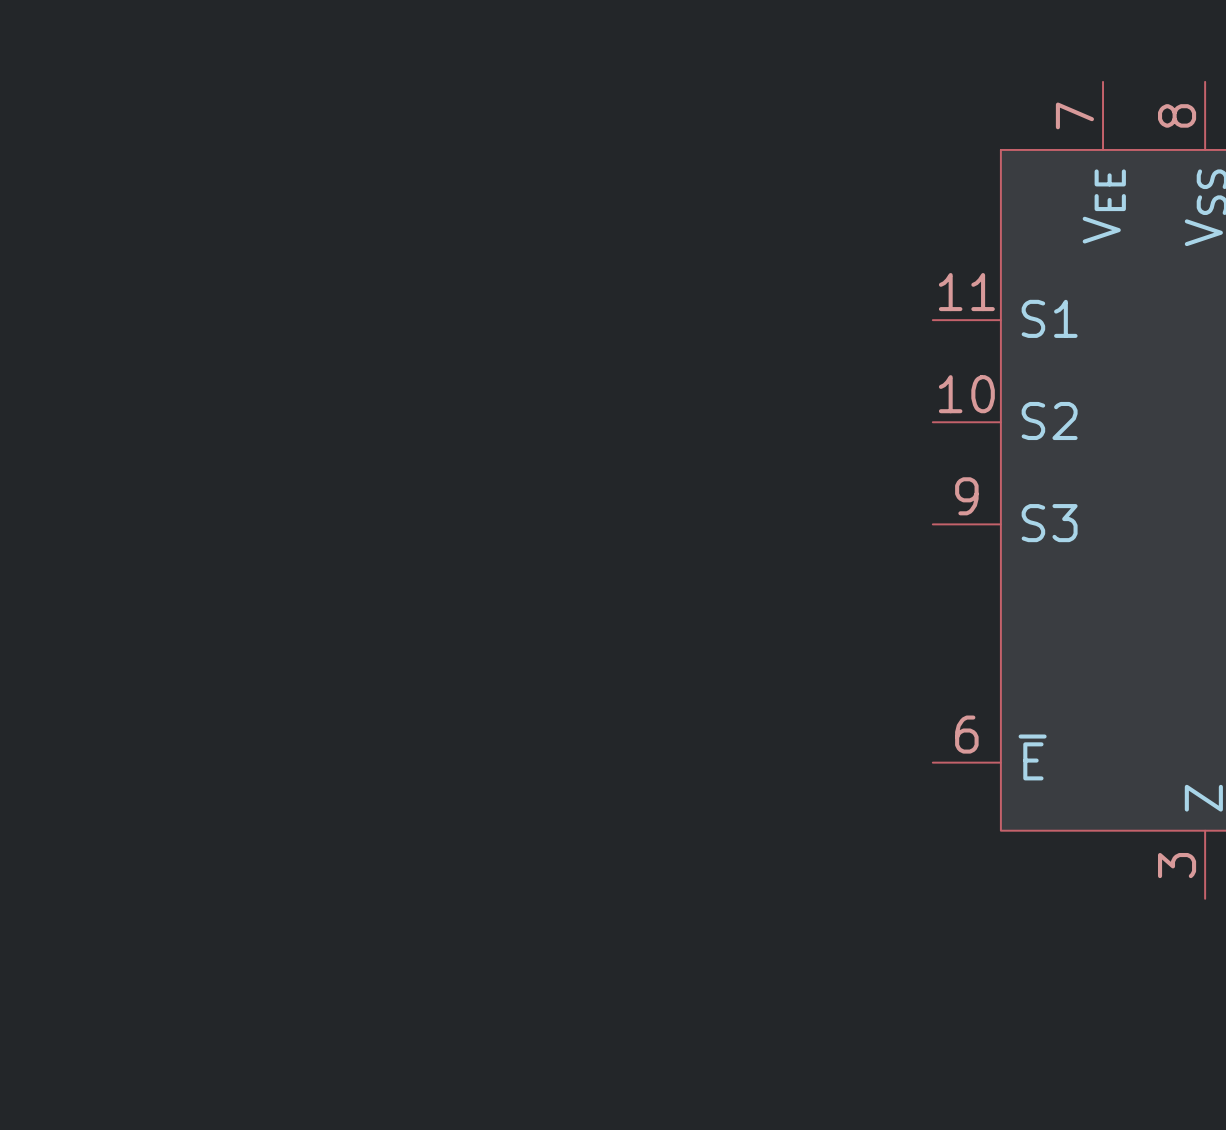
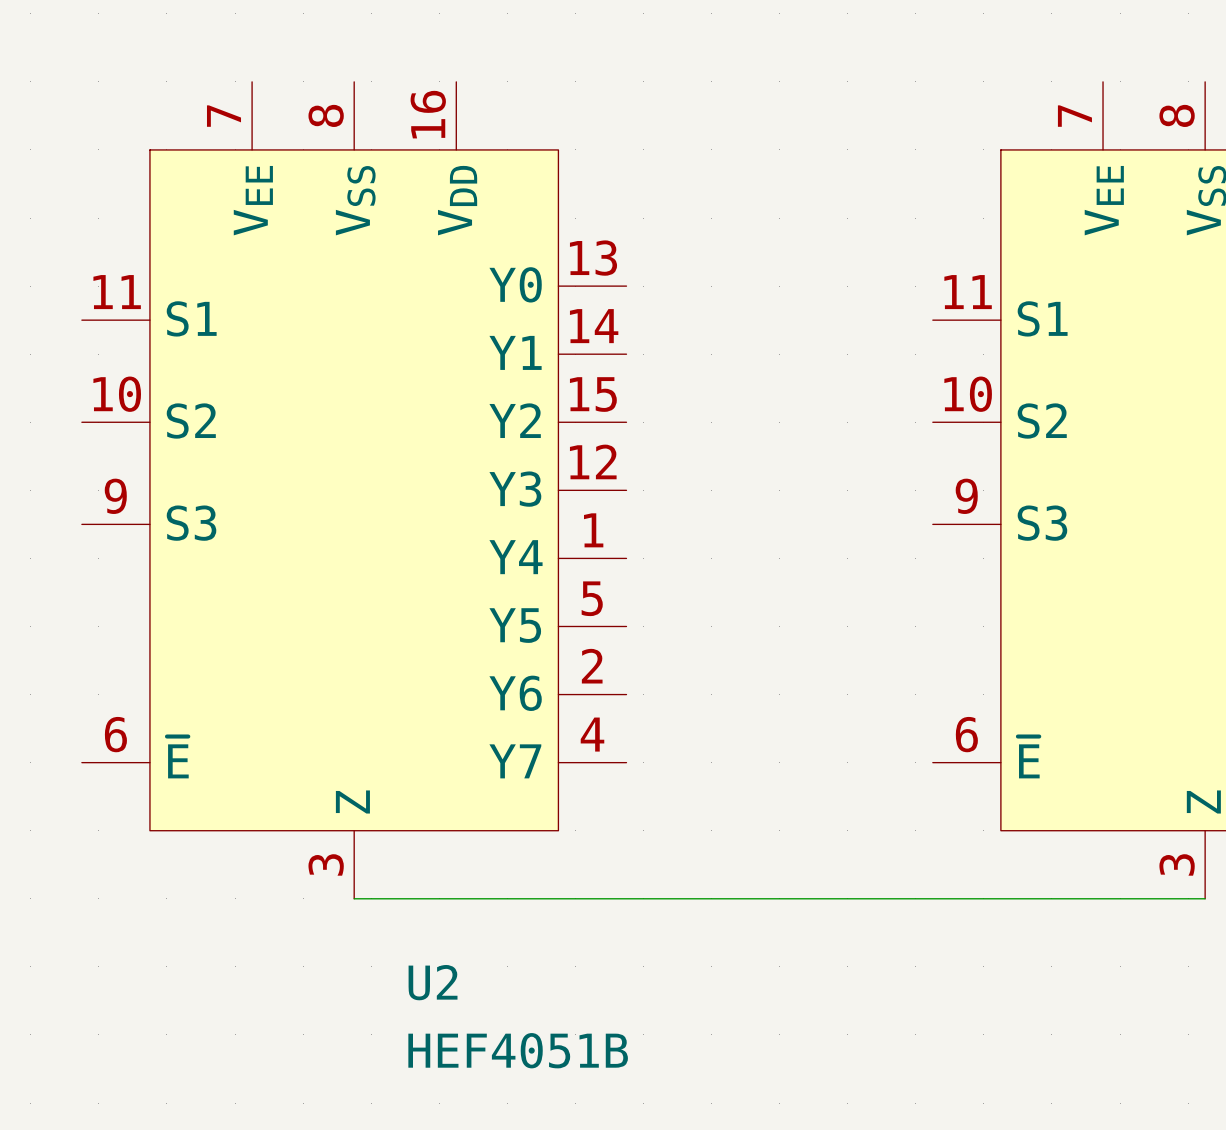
U2: none -> HEF4051B (354, 490)
wire: none -> (354, 898) (1205, 898)

